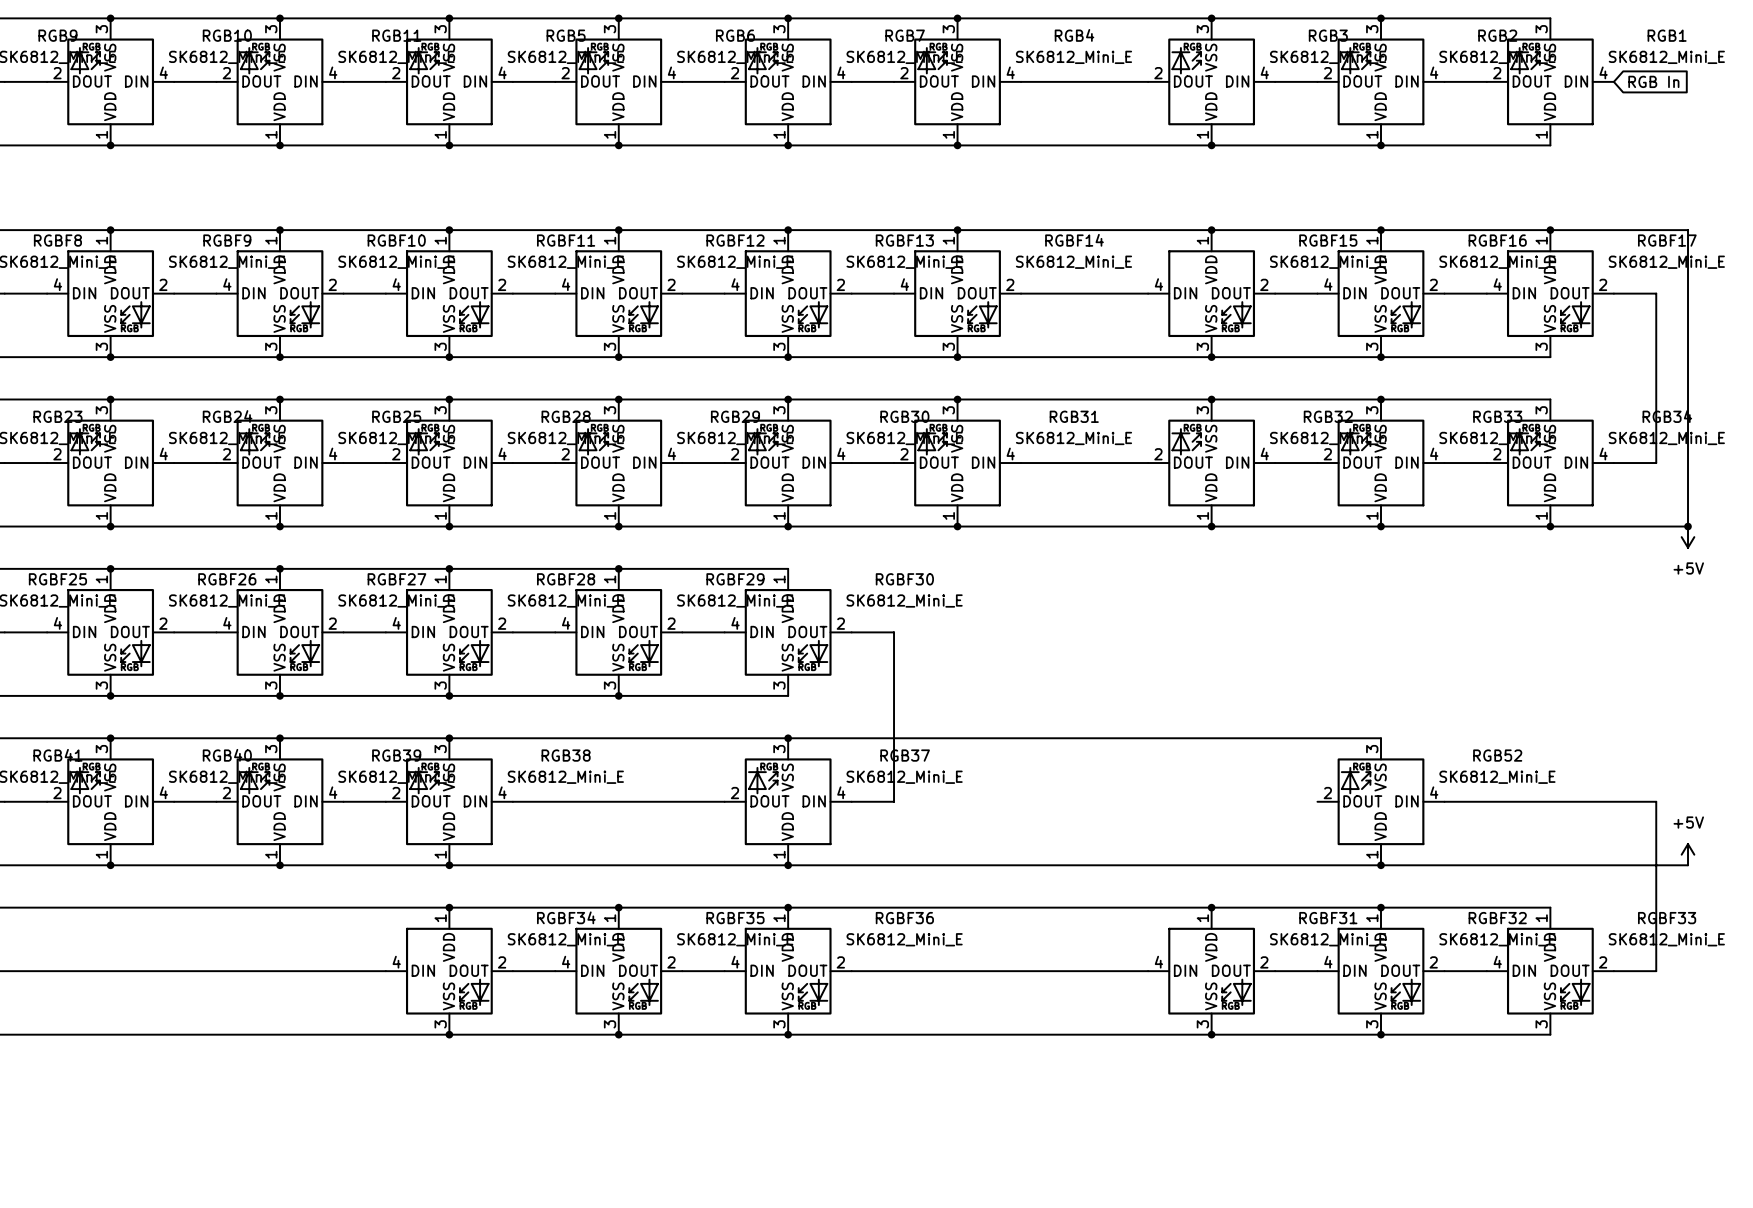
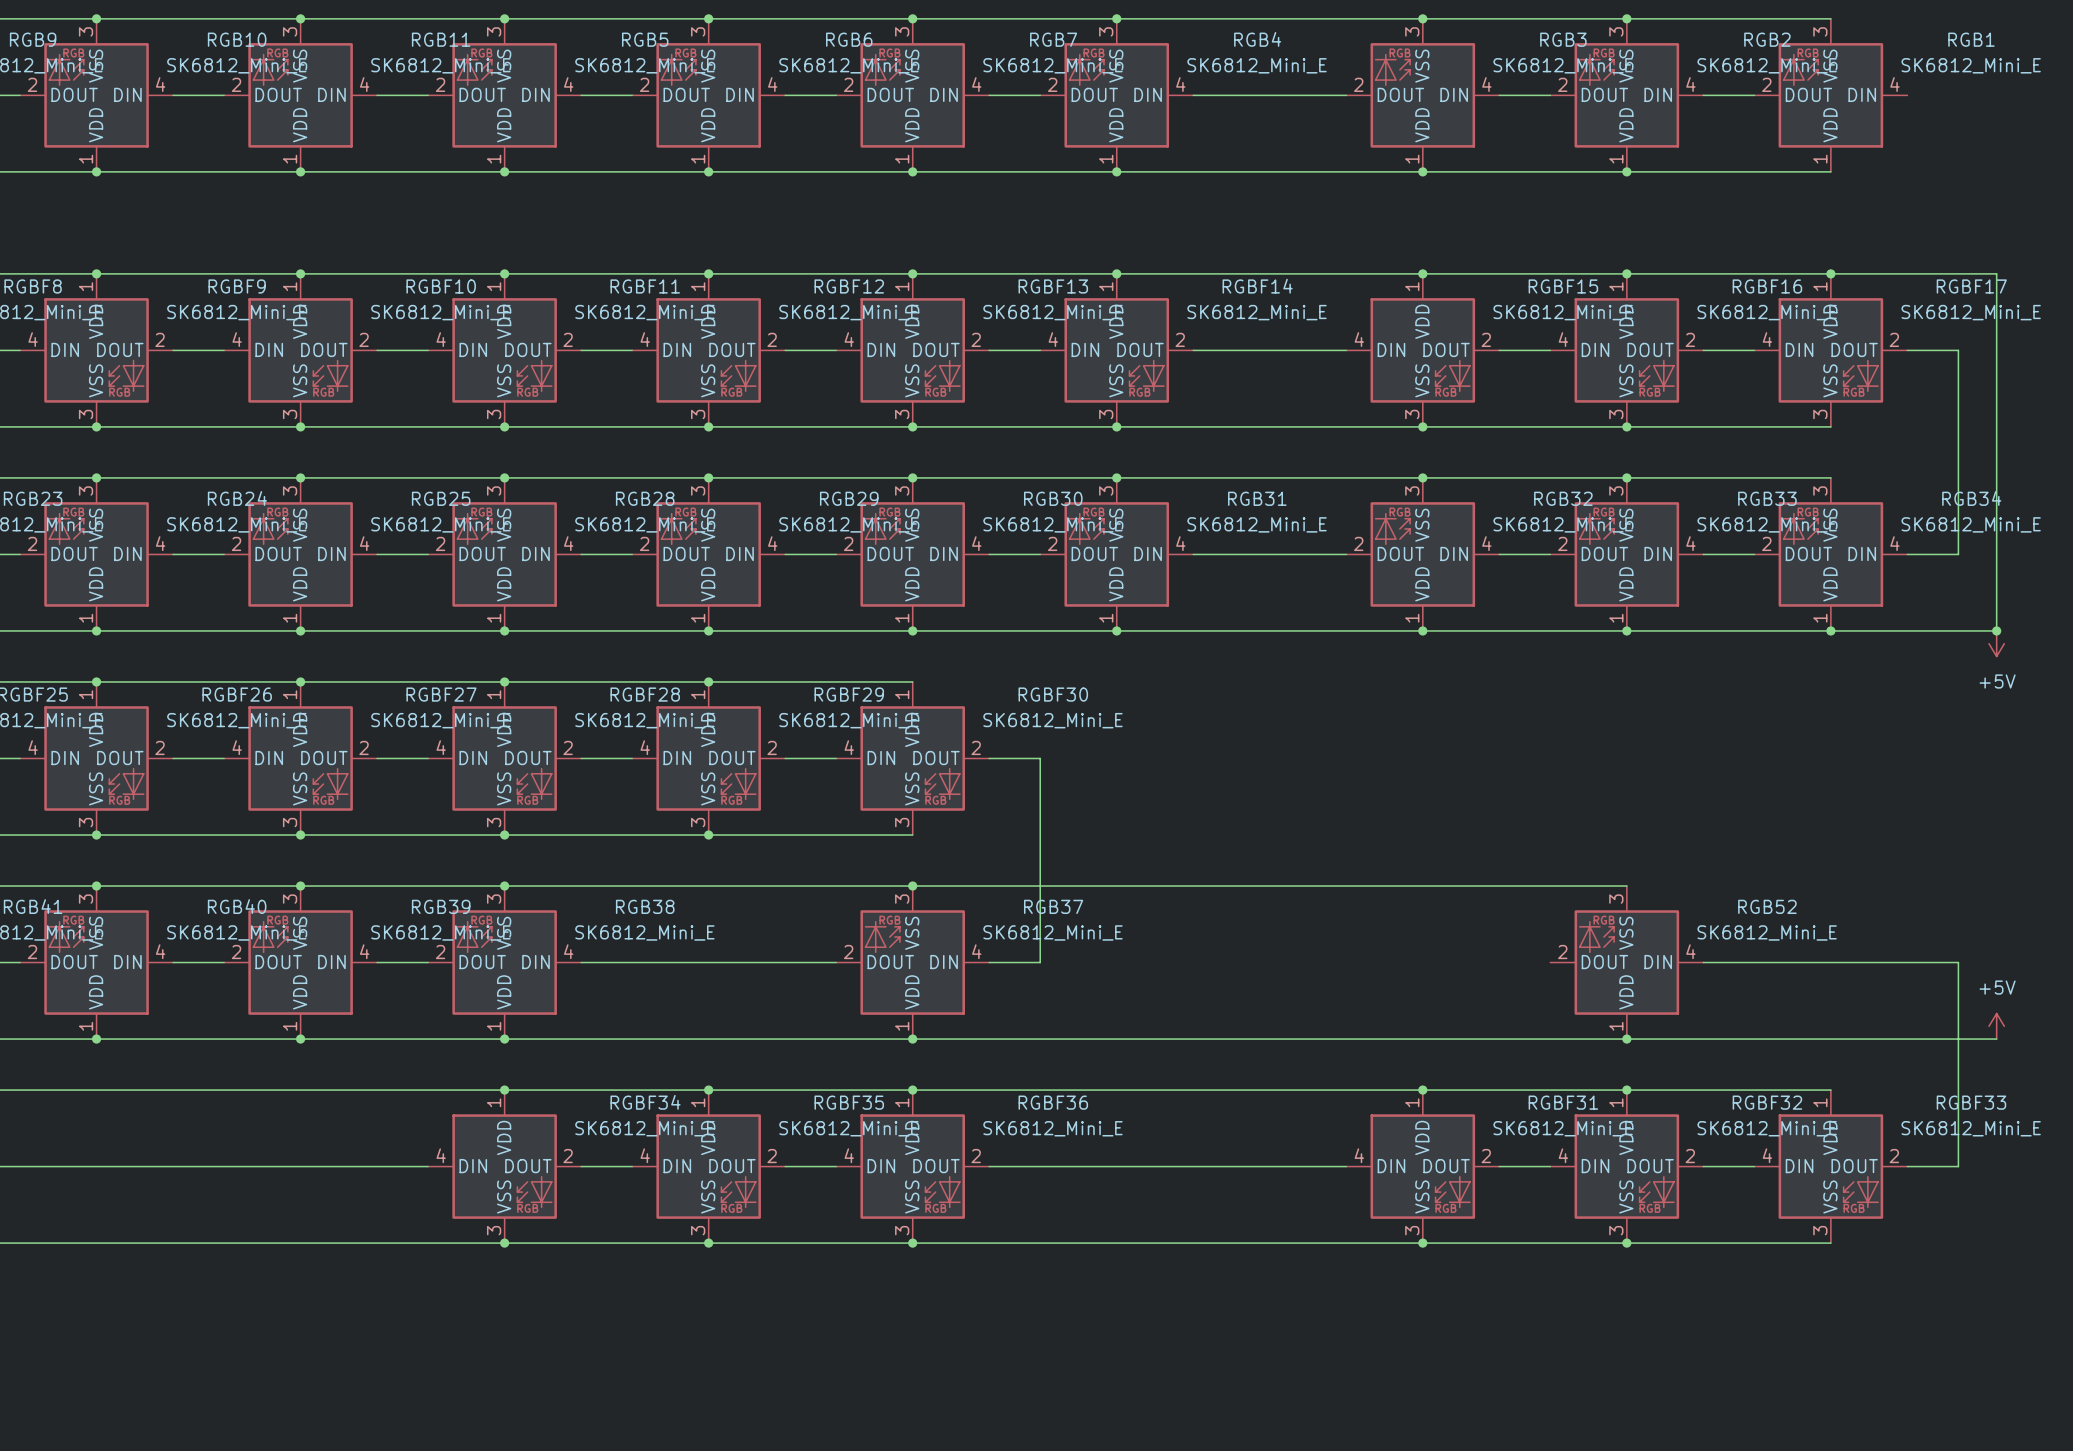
global label: RGB In (1653, 81) -> none

